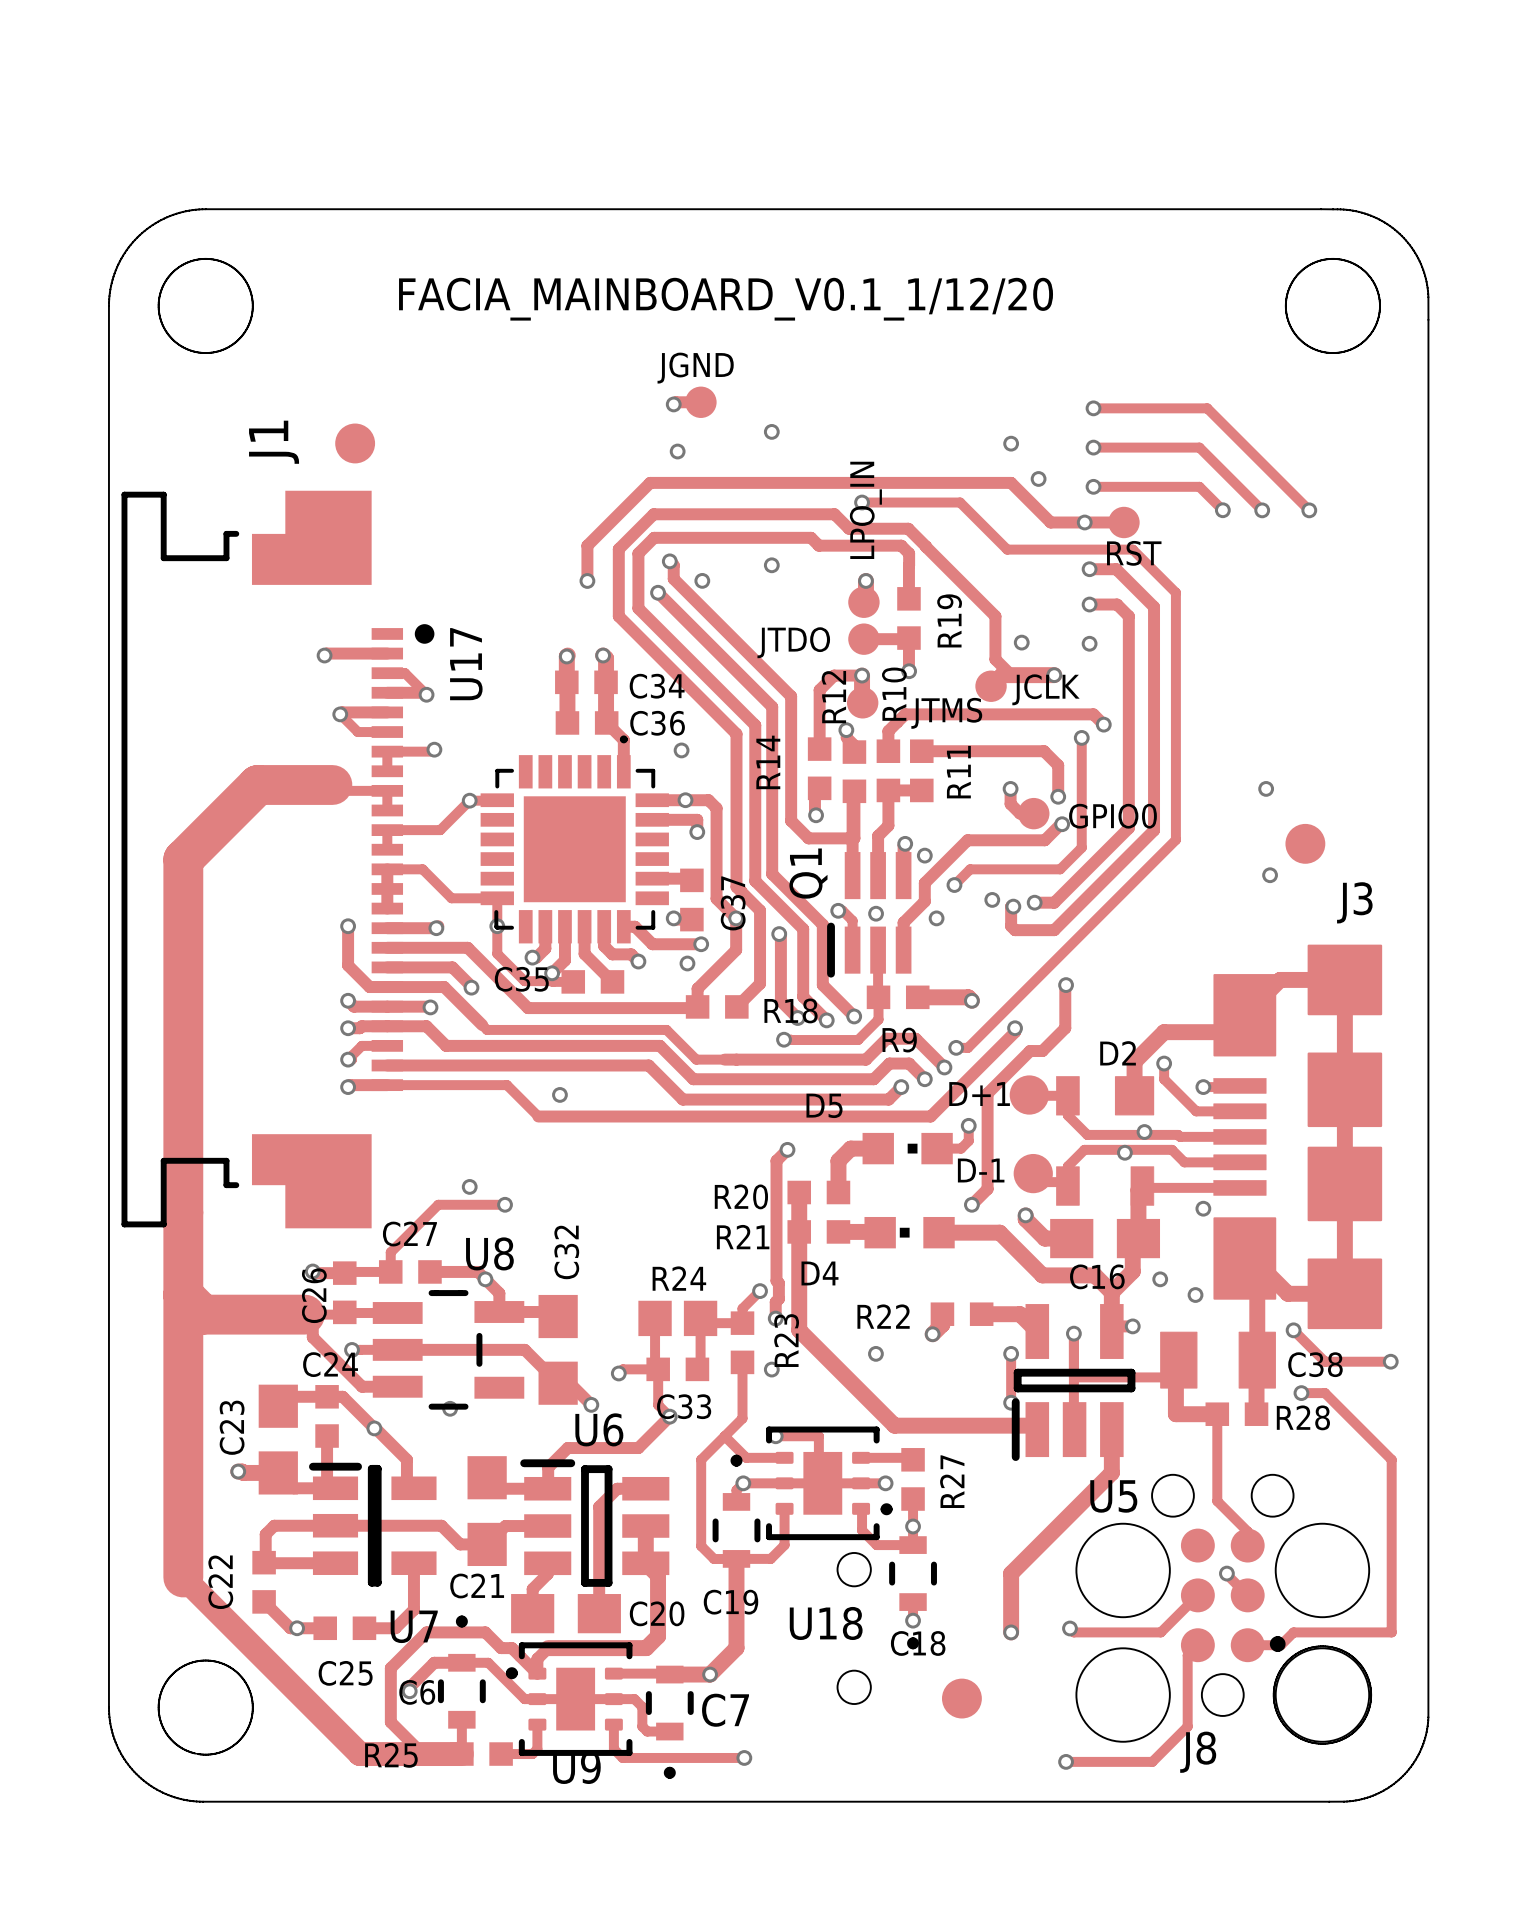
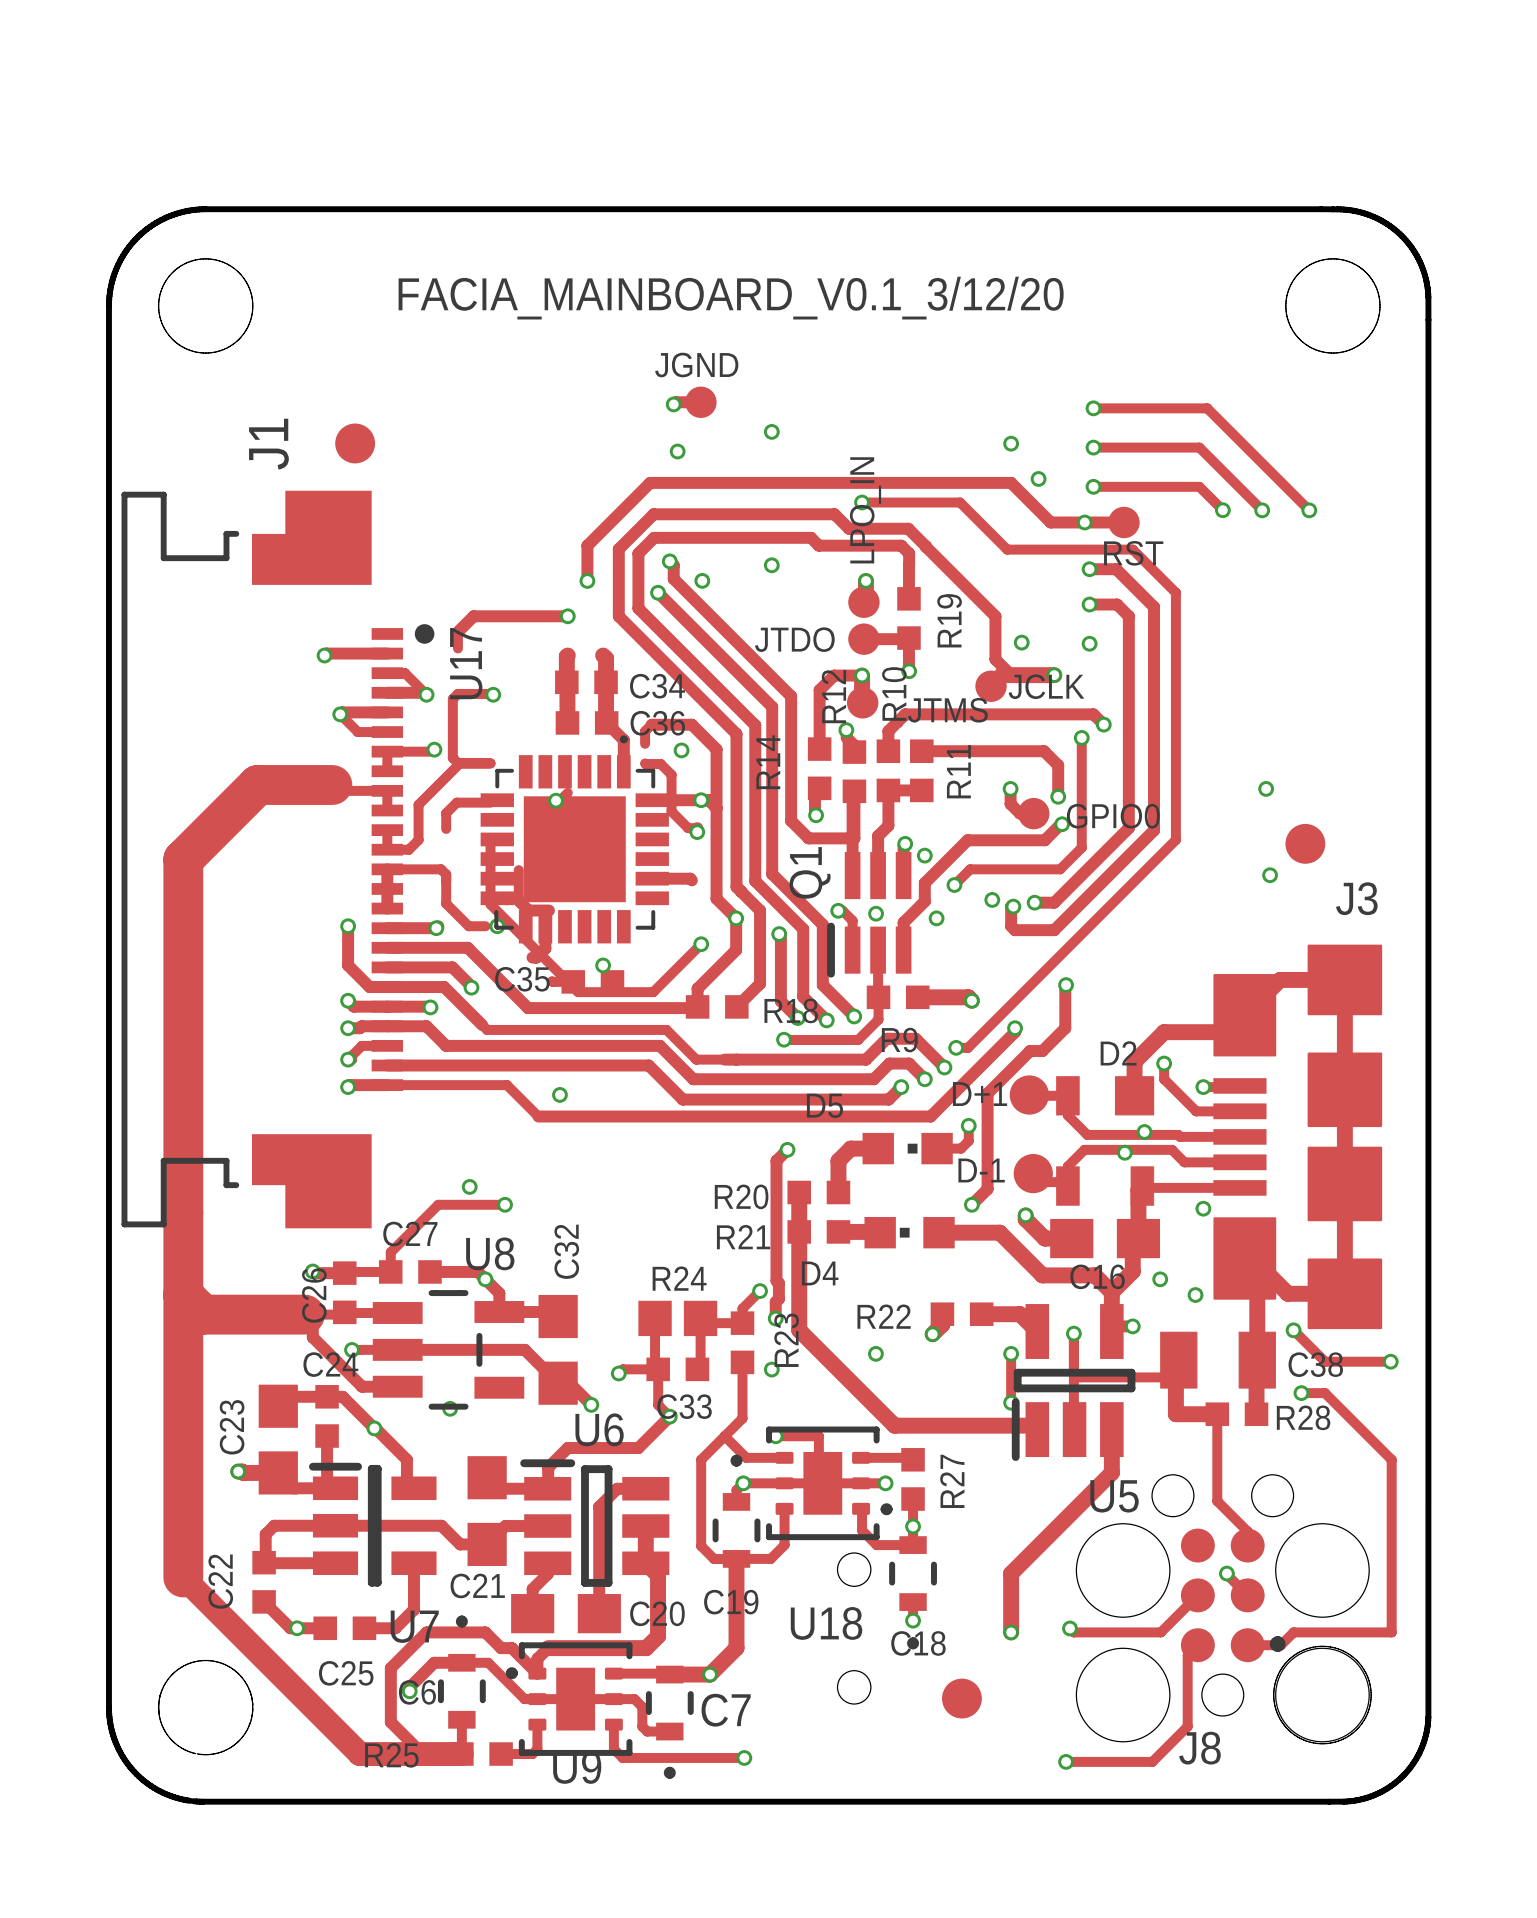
text: FACIA_MAINBOARD_V0.1_1/12/20 (726, 299) -> FACIA_MAINBOARD_V0.1_3/12/20 (731, 298)
track: none -> (567, 616) (473, 616) (457, 631) (457, 648)
via: none -> (567, 616)
via: (603, 655) -> none
via: (566, 656) -> none
track: none -> (493, 694) (457, 693) (452, 699) (452, 757) (458, 763) (490, 763)
via: none -> (493, 694)
track: none -> (645, 743) (645, 731) (651, 724) (691, 724) (716, 749) (716, 808)
track: none -> (459, 763) (418, 804) (418, 840) (408, 849) (387, 849)
track: none -> (567, 792) (559, 800)
via: (469, 800) -> none
track: (496, 800) (469, 800) (440, 830) (387, 830) -> none
via: none -> (556, 800)
via position: (685, 800) -> (701, 800)
track: none -> (490, 802) (456, 802) (446, 813) (446, 828)
track: (652, 819) (697, 819) (697, 828) -> (645, 763) (660, 764) (671, 774) (671, 811) (688, 828) (697, 828)
track: (422, 869) (451, 898) (497, 898) (497, 953) (524, 981) (552, 981) (552, 973) (564, 960) (564, 926) -> (422, 869) (441, 869) (446, 874) (446, 903) (468, 926) (485, 926)
track: none -> (518, 870) (518, 900) (528, 910) (548, 910)
C37: (691, 899) -> none
via: (673, 918) -> none
track: (584, 926) (584, 954) (612, 981) -> none
track: (604, 926) (604, 946) (612, 954) (631, 954) (638, 961) -> none
track: (623, 926) (635, 926) (652, 944) (701, 944) -> (490, 841) (490, 904) (578, 992) (653, 992) (701, 944)
via: (532, 957) -> none
via: (638, 961) -> none
via: (687, 963) -> none
via: none -> (603, 965)
via: (552, 973) -> none
board edge width: thin (190, 1800) (171, 1796) (156, 1789) (132, 1769) (115, 1742) (109, 1710) (108, 305) (114, 273) (128, 247) (144, 230) (164, 218) (182, 211) (205, 209) (1337, 209) (1367, 214) (1392, 227) (1408, 242) (1418, 258) (1425, 278) (1428, 297) (1428, 1717) (1423, 1743) (1410, 1767) (1396, 1782) (1381, 1791) (1364, 1798) (1344, 1801) (193, 1801) -> thick (190, 1800) (171, 1796) (156, 1789) (132, 1769) (115, 1742) (109, 1710) (108, 305) (114, 273) (128, 247) (144, 230) (164, 218) (182, 211) (205, 209) (1337, 209) (1367, 214) (1392, 227) (1408, 242) (1418, 258) (1425, 278) (1428, 297) (1428, 1717) (1423, 1743) (1410, 1767) (1396, 1782) (1381, 1791) (1364, 1798) (1344, 1801) (193, 1801)

